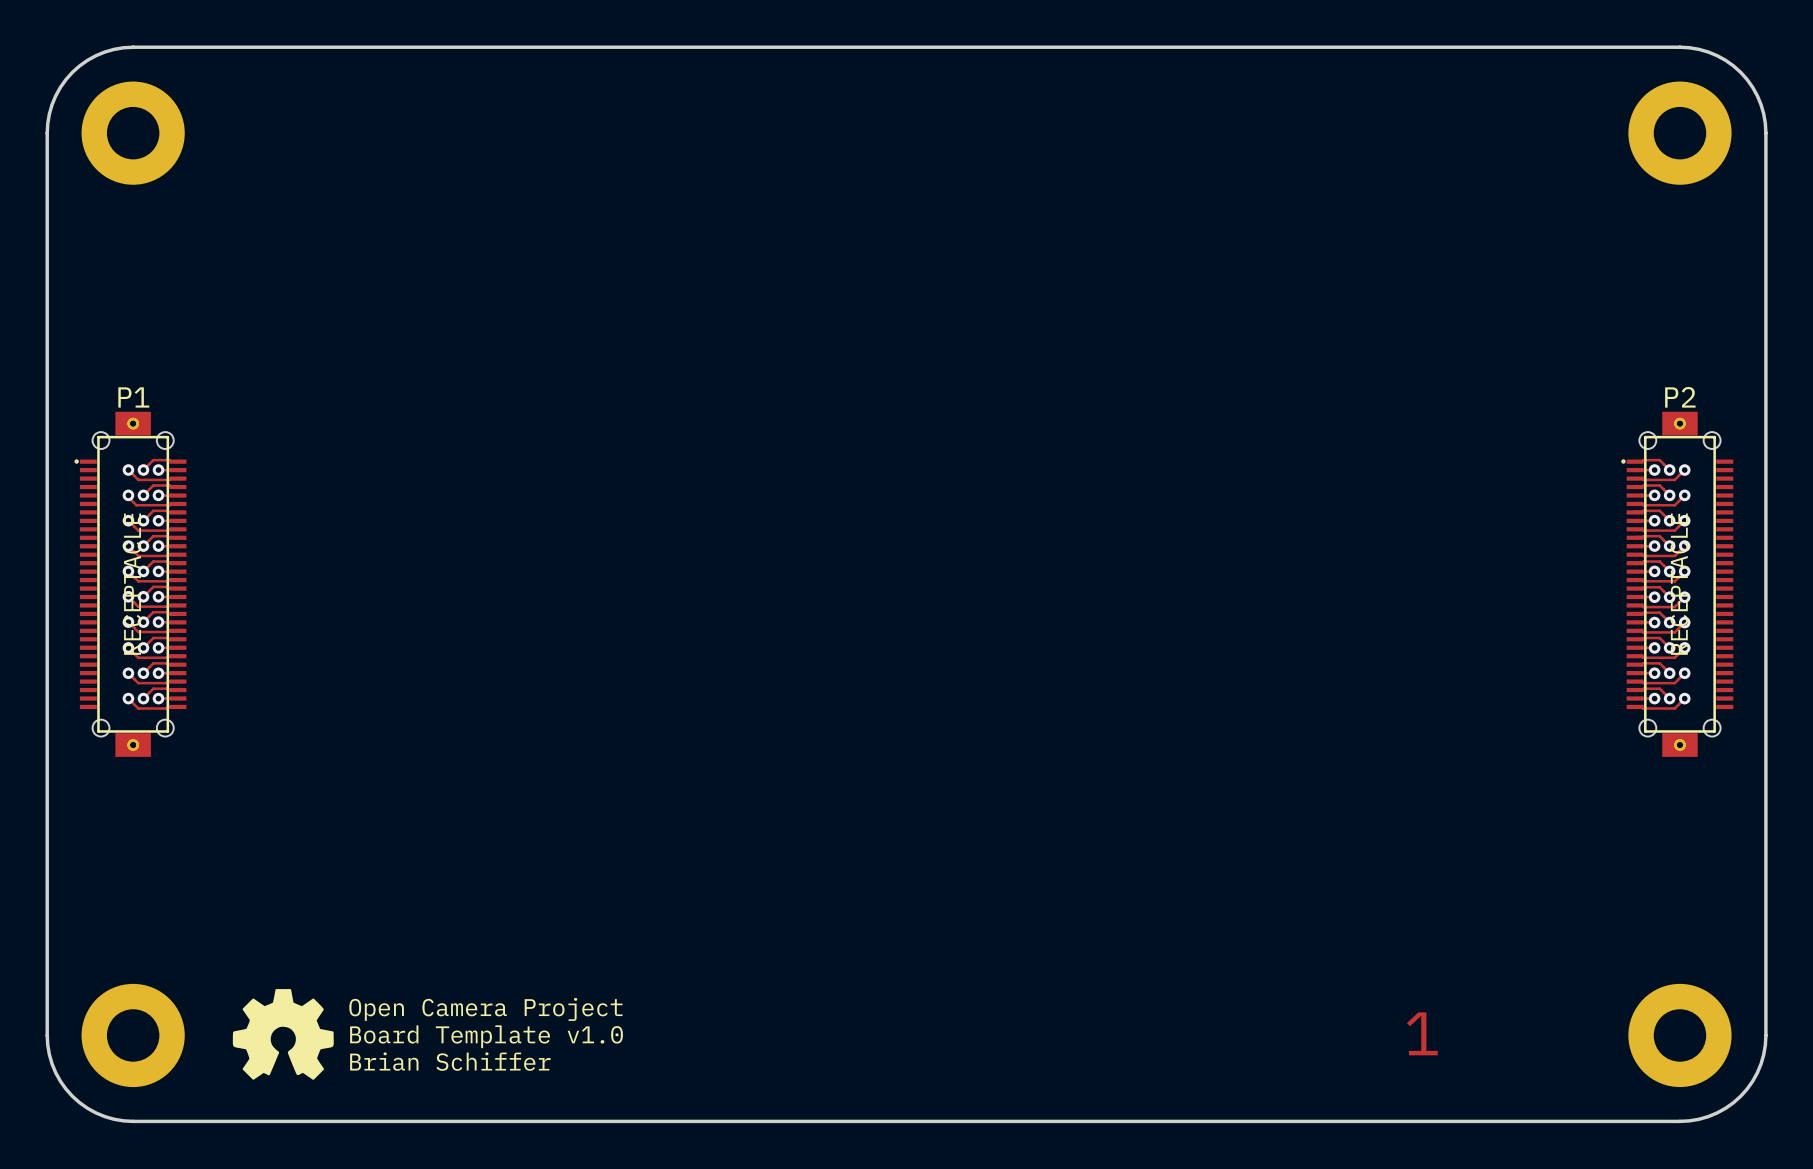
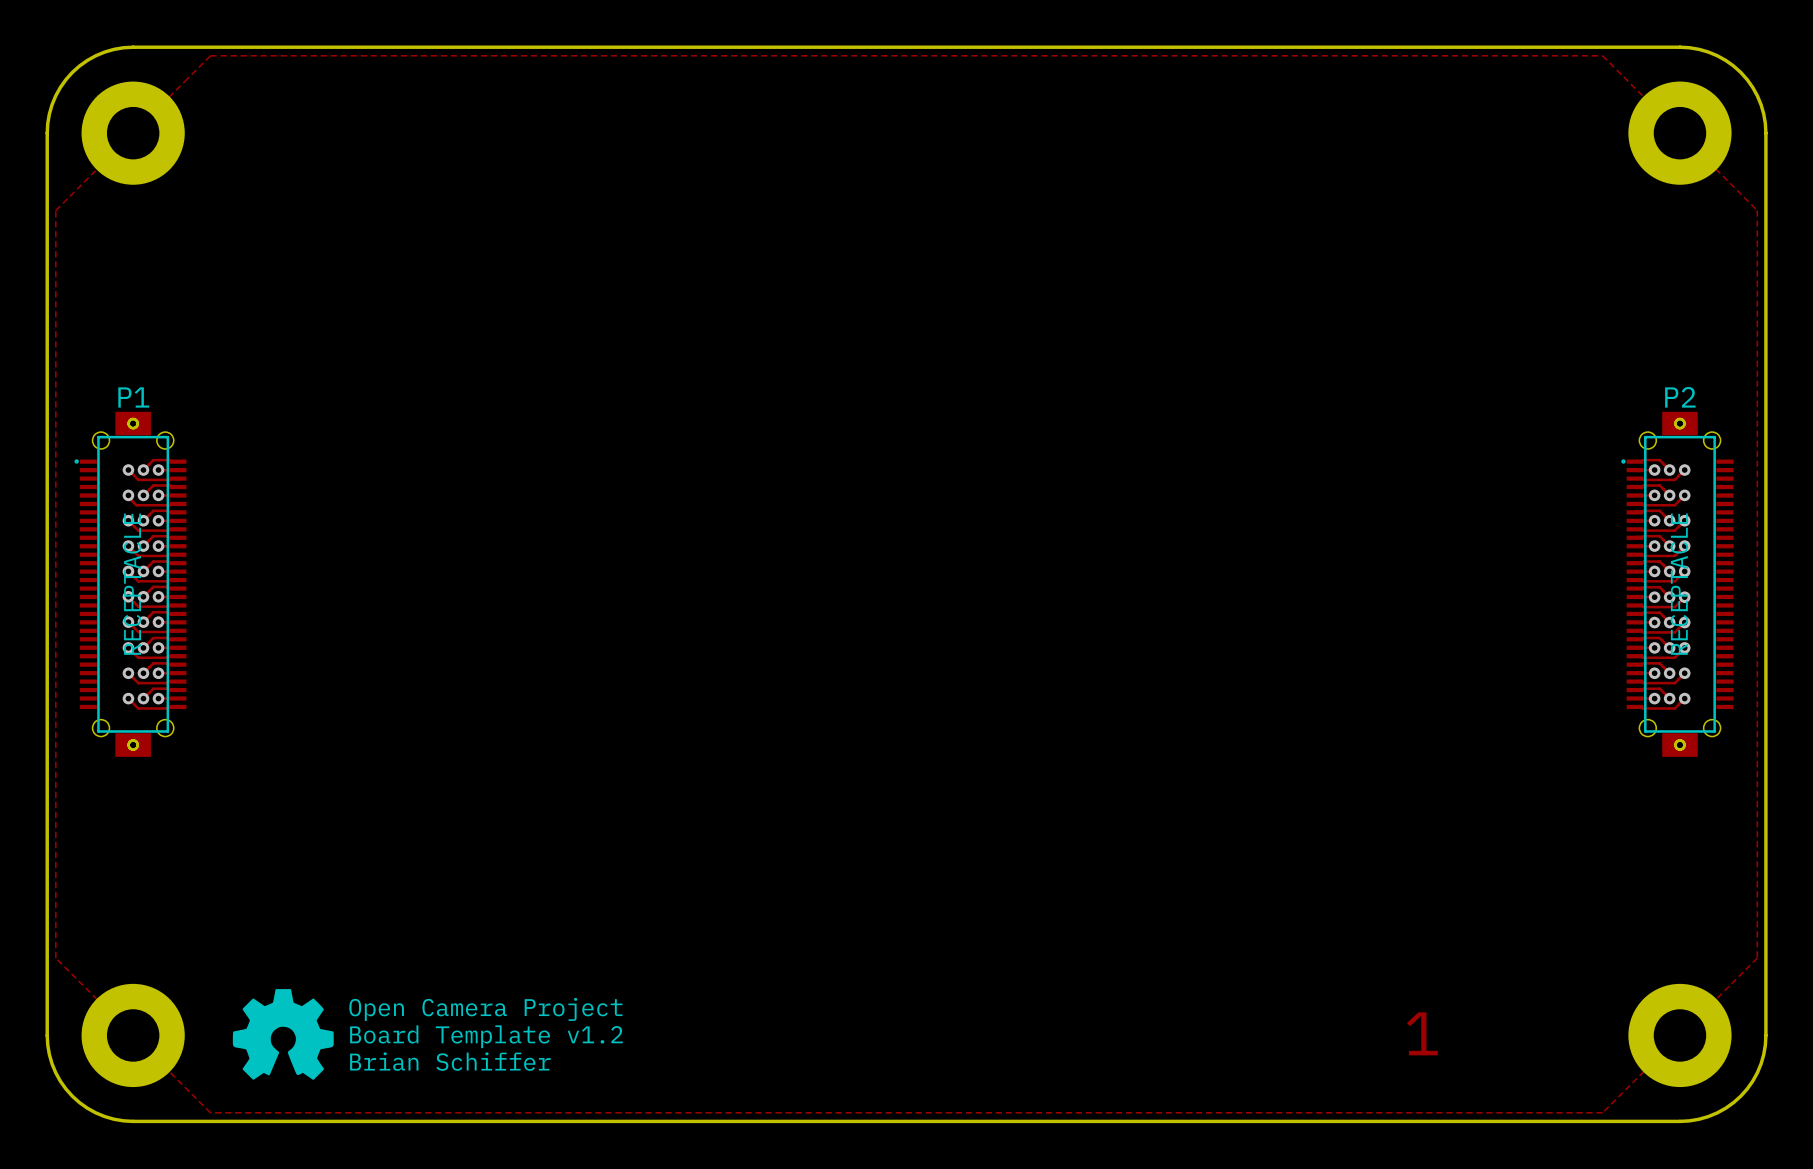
zone outline: none -> (210, 55) (55, 210) (55, 958) (210, 1112) (1602, 1112) (1757, 958) (1757, 210) (1602, 55) (210, 55)
text: Board Template v1.0 (486, 1036) -> Board Template v1.2 (486, 1036)

